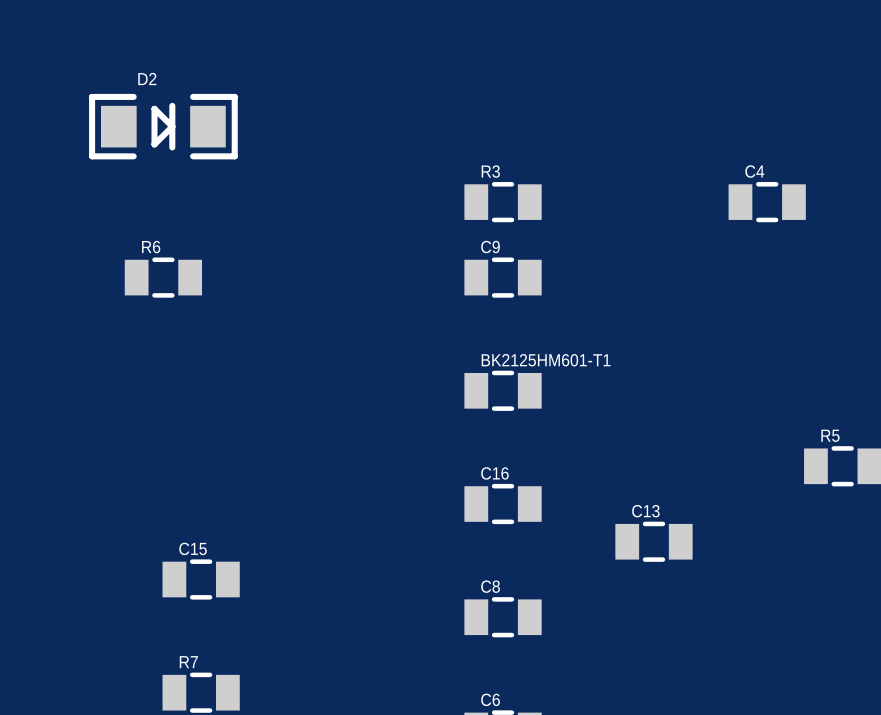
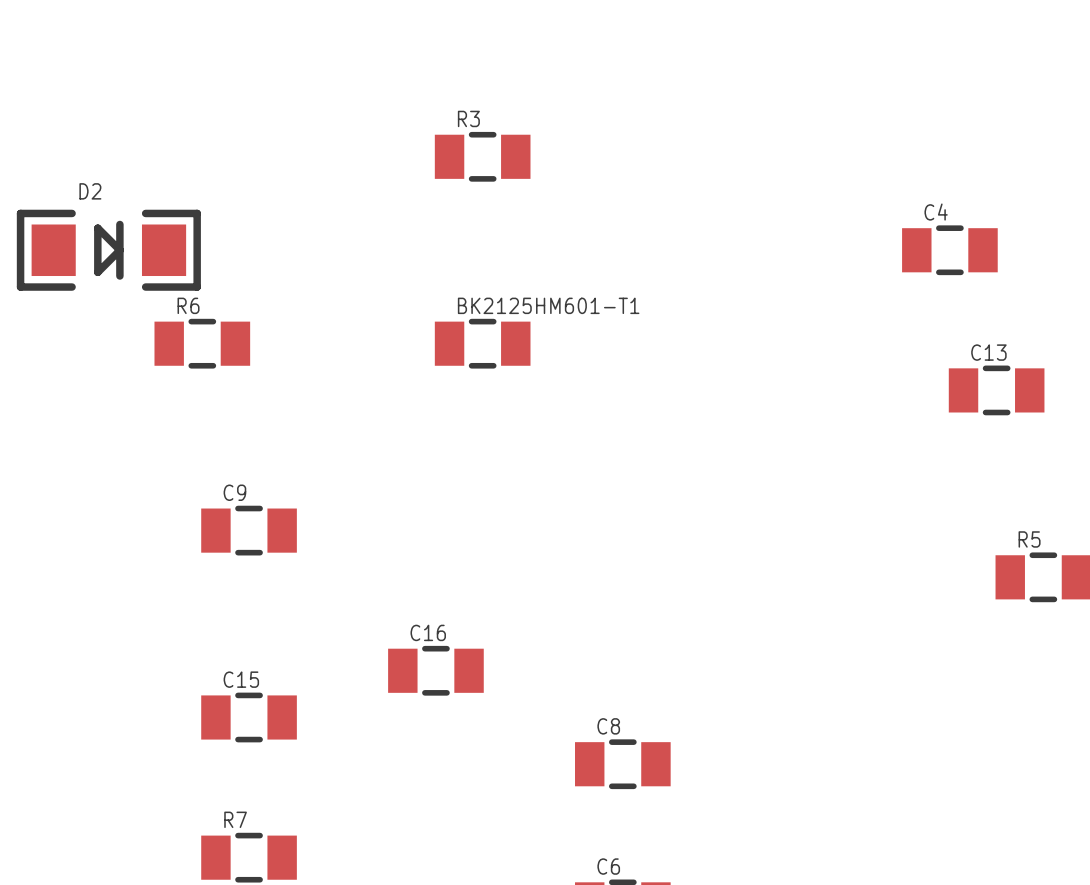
D2 position: (163, 126) -> (108, 250)
R3 position: (503, 202) -> (482, 156)
C9 position: (503, 277) -> (249, 530)
BK2125HM601-T1 position: (503, 390) -> (482, 343)
C16 position: (503, 504) -> (435, 670)
C13 position: (653, 541) -> (996, 390)

